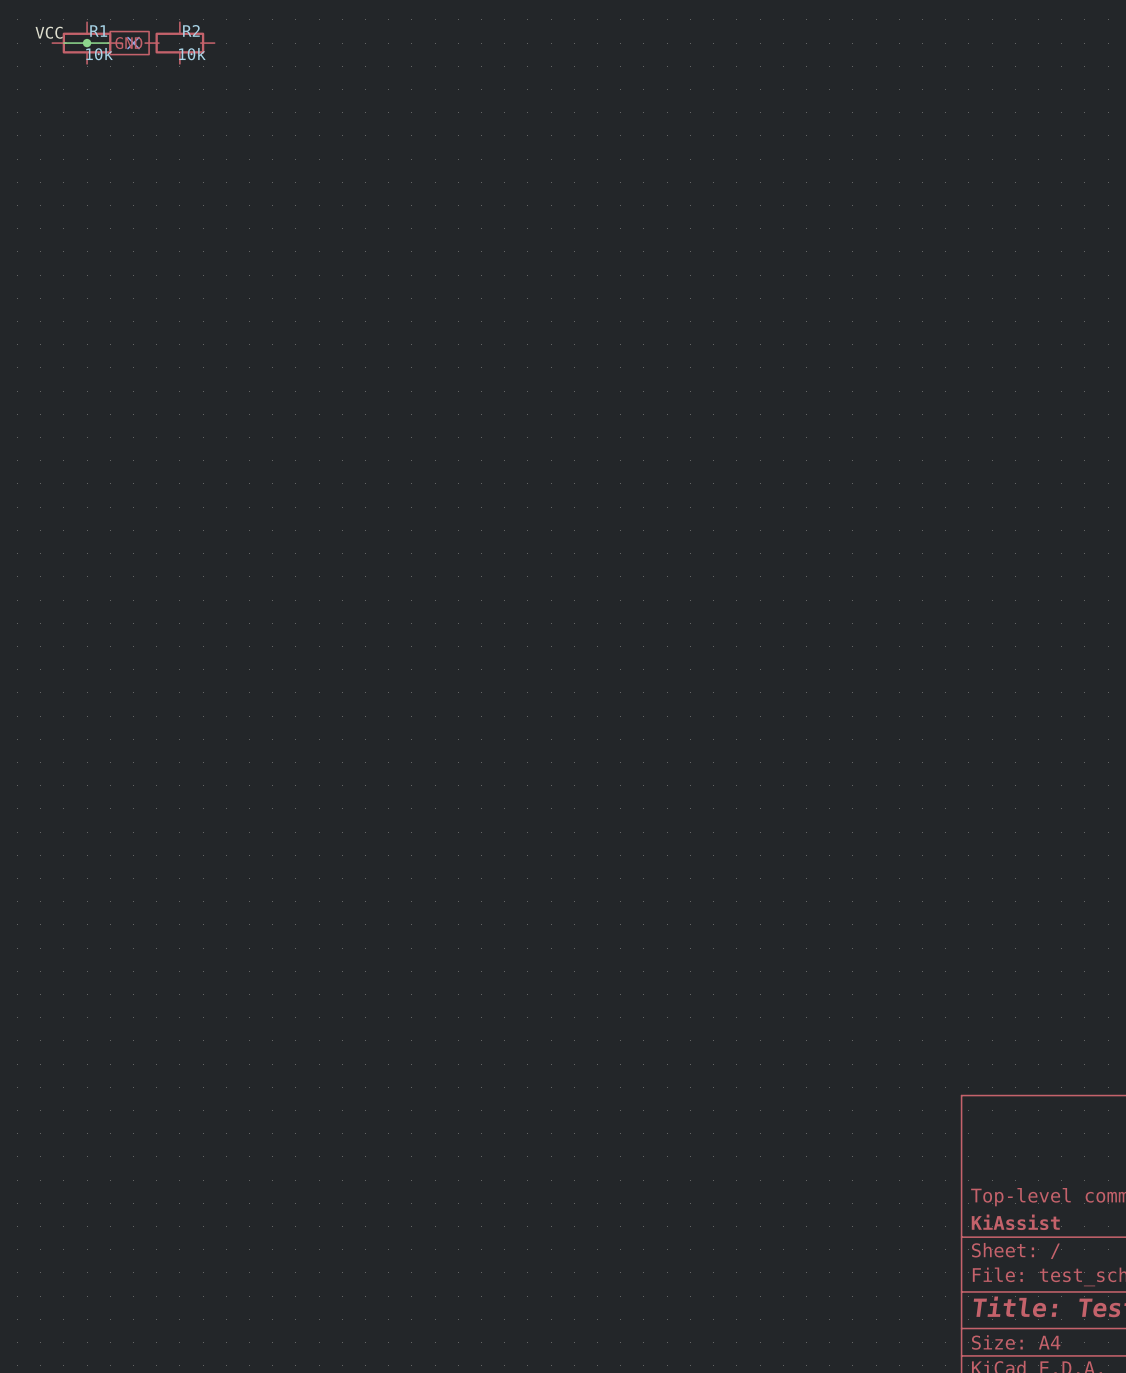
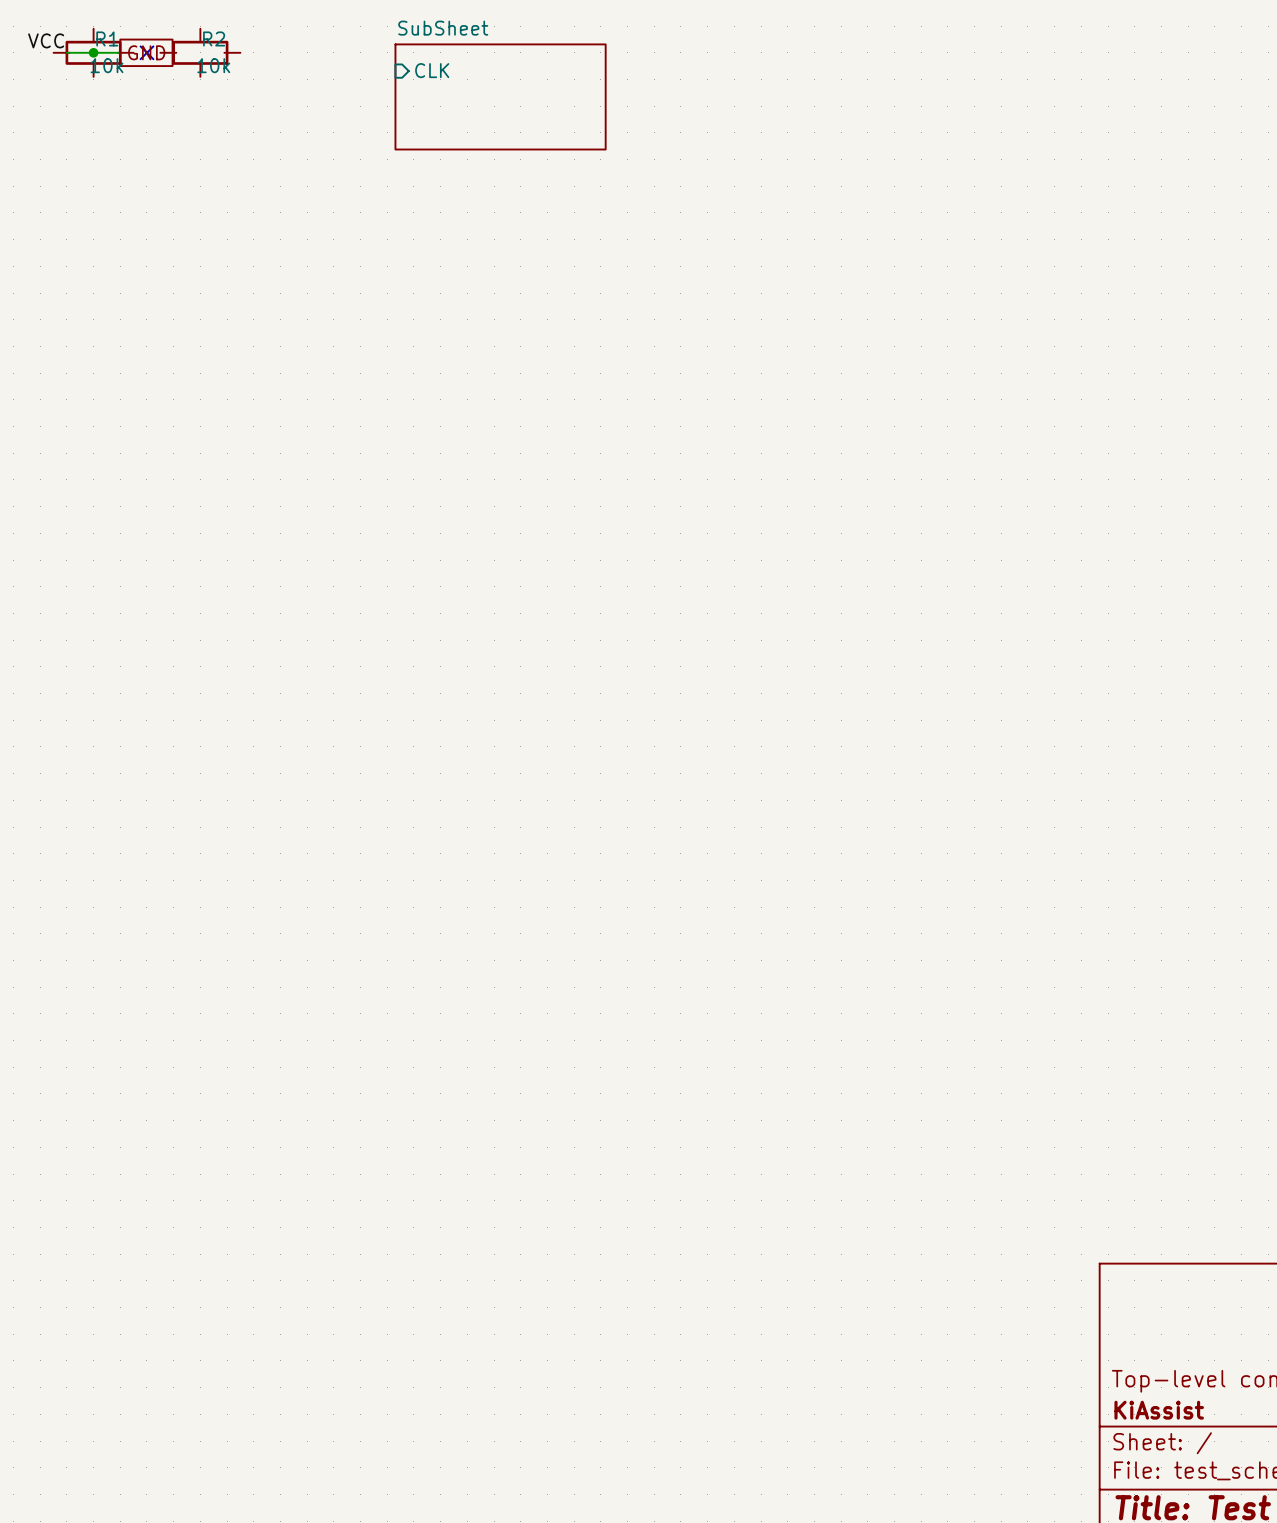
sheet pin: none -> CLK (432, 70)
sheet SubSheet: none -> (500, 96)

